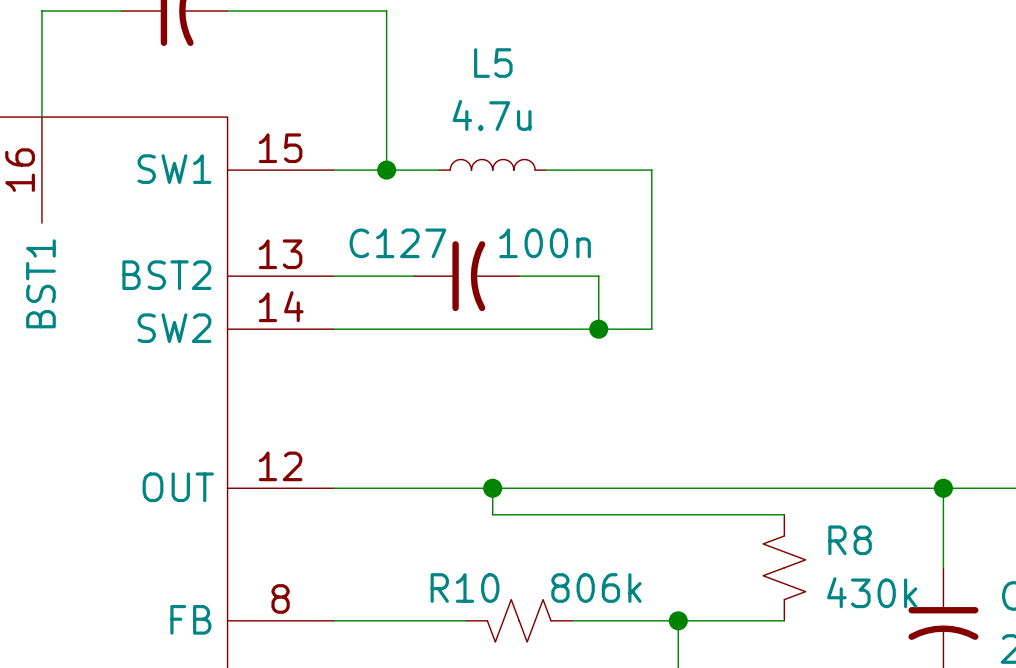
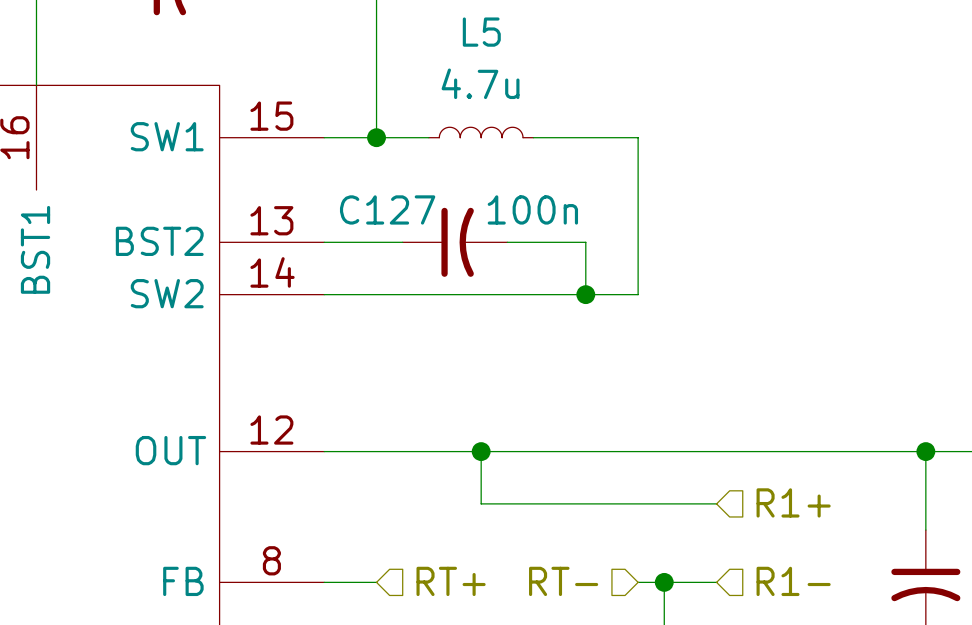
wire: (492, 514) (784, 514) -> (481, 477) (481, 503) (716, 503)
hierarchical label: none -> R1+ (793, 502)
R8: 430k (784, 567) -> none
hierarchical label: none -> RT+ (451, 581)
hierarchical label: none -> RT- (563, 581)
hierarchical label: none -> R1- (793, 581)
wire: (386, 620) (466, 620) -> none
R10: 806k (519, 620) -> none
wire: (572, 620) (651, 620) -> none
wire: (731, 620) (784, 620) -> none

